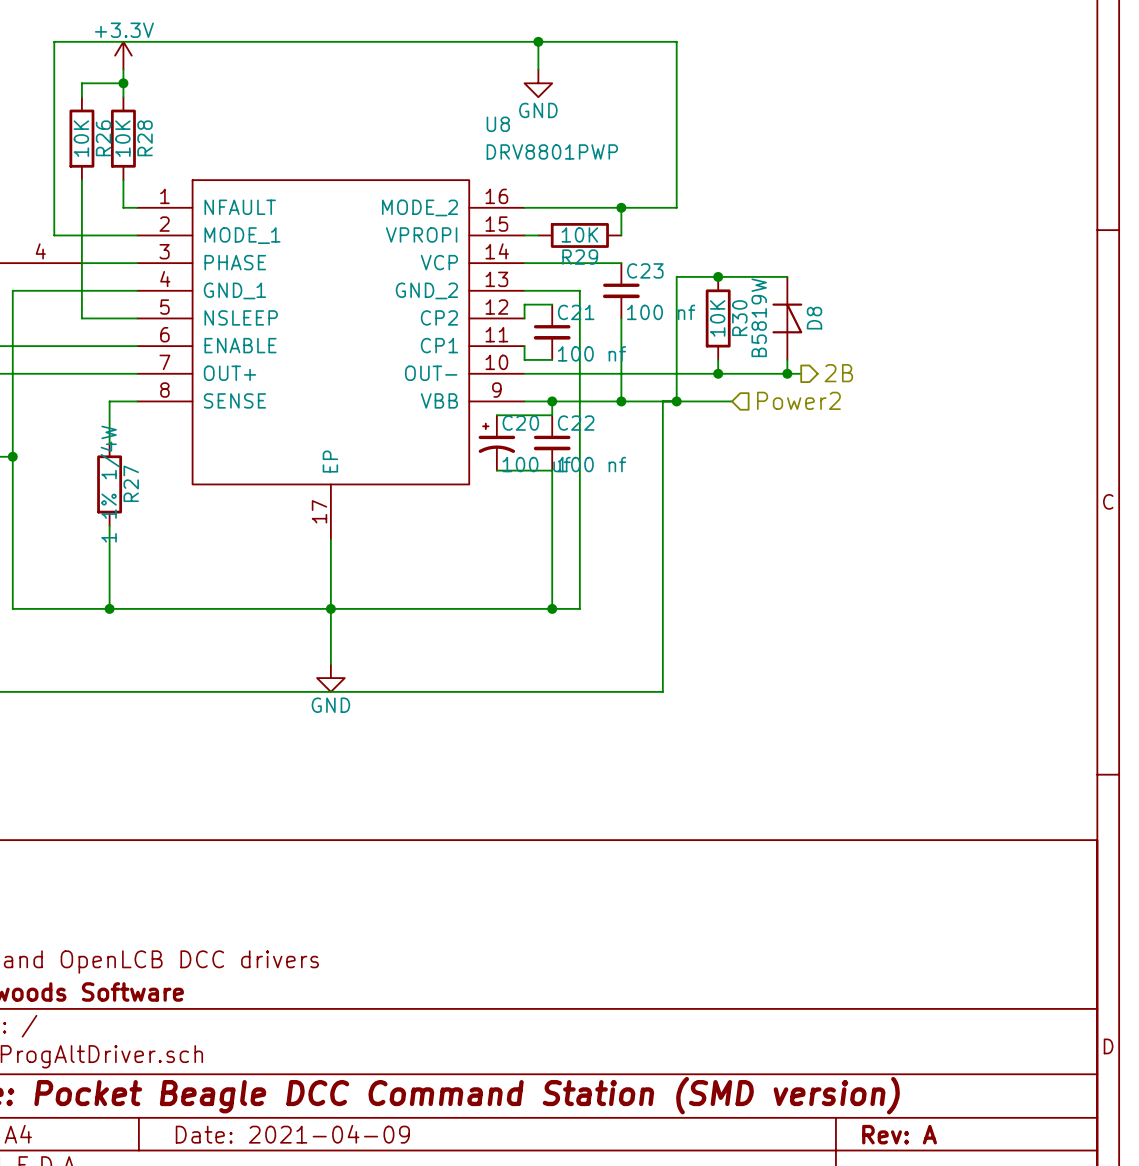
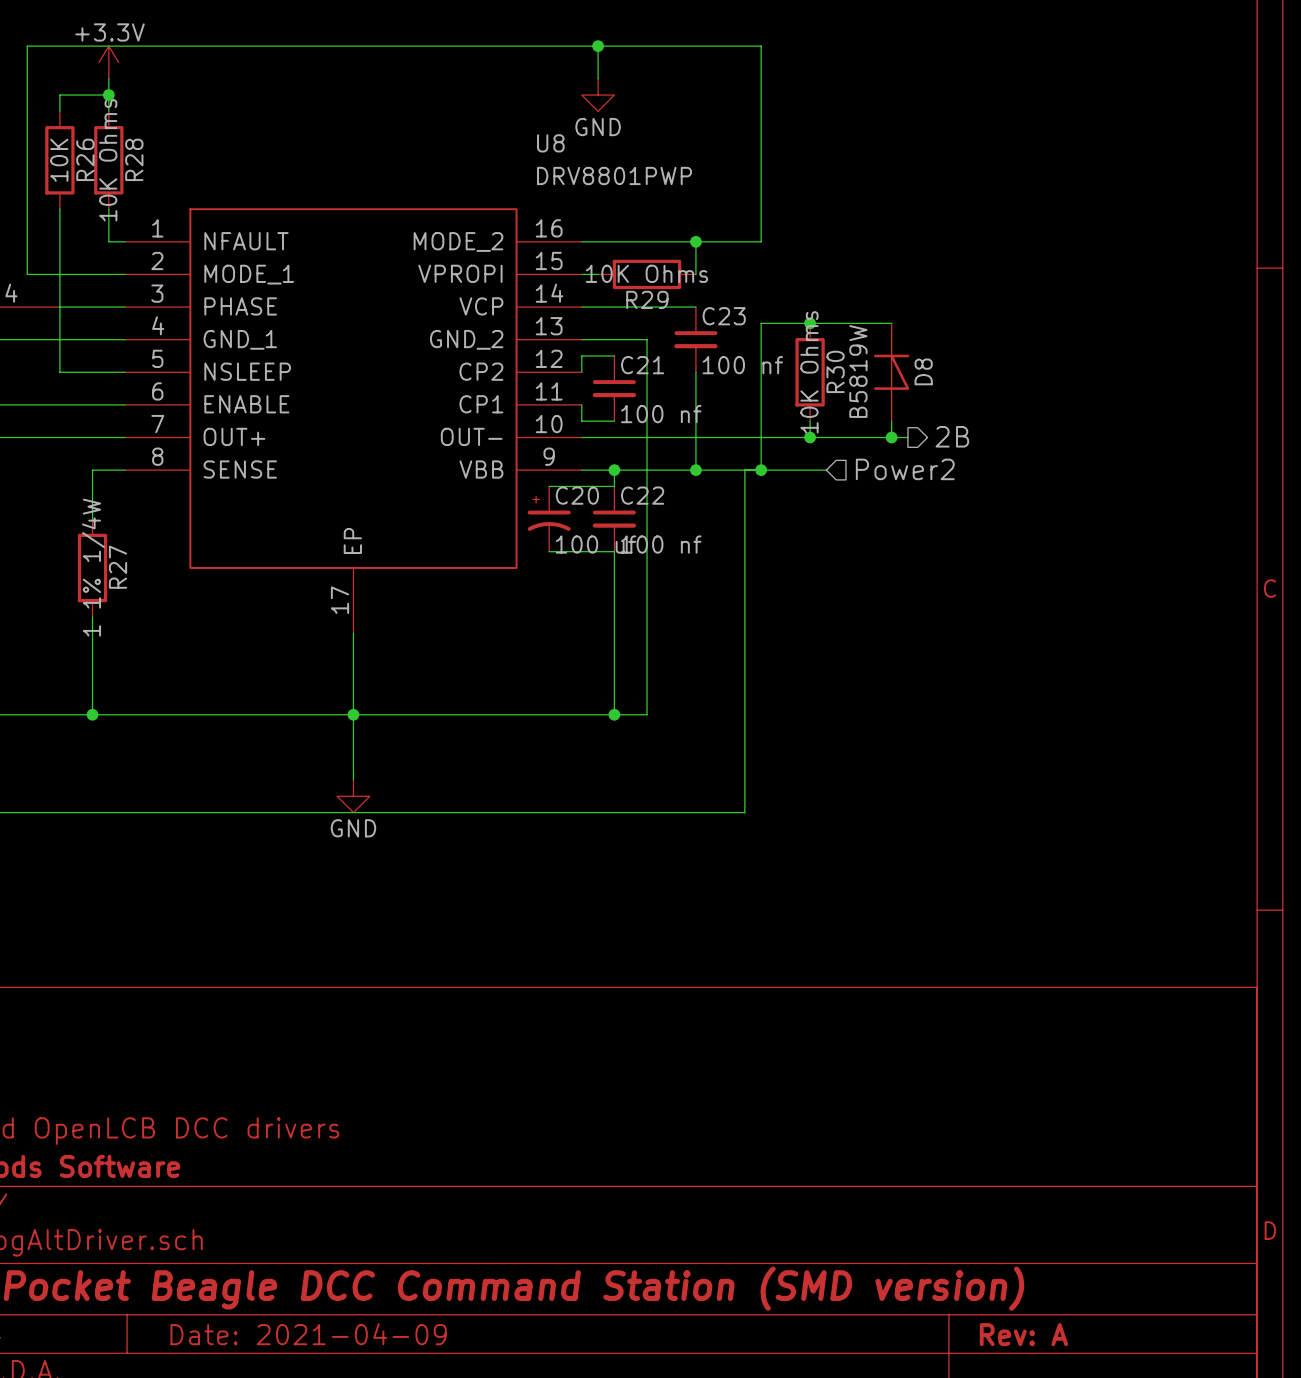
R28 value: 10K (122, 138) -> 10K Ohms (108, 160)
R29 value: 10K (579, 234) -> 10K Ohms (647, 273)
R30 value: 10K (717, 318) -> 10K Ohms (809, 372)

